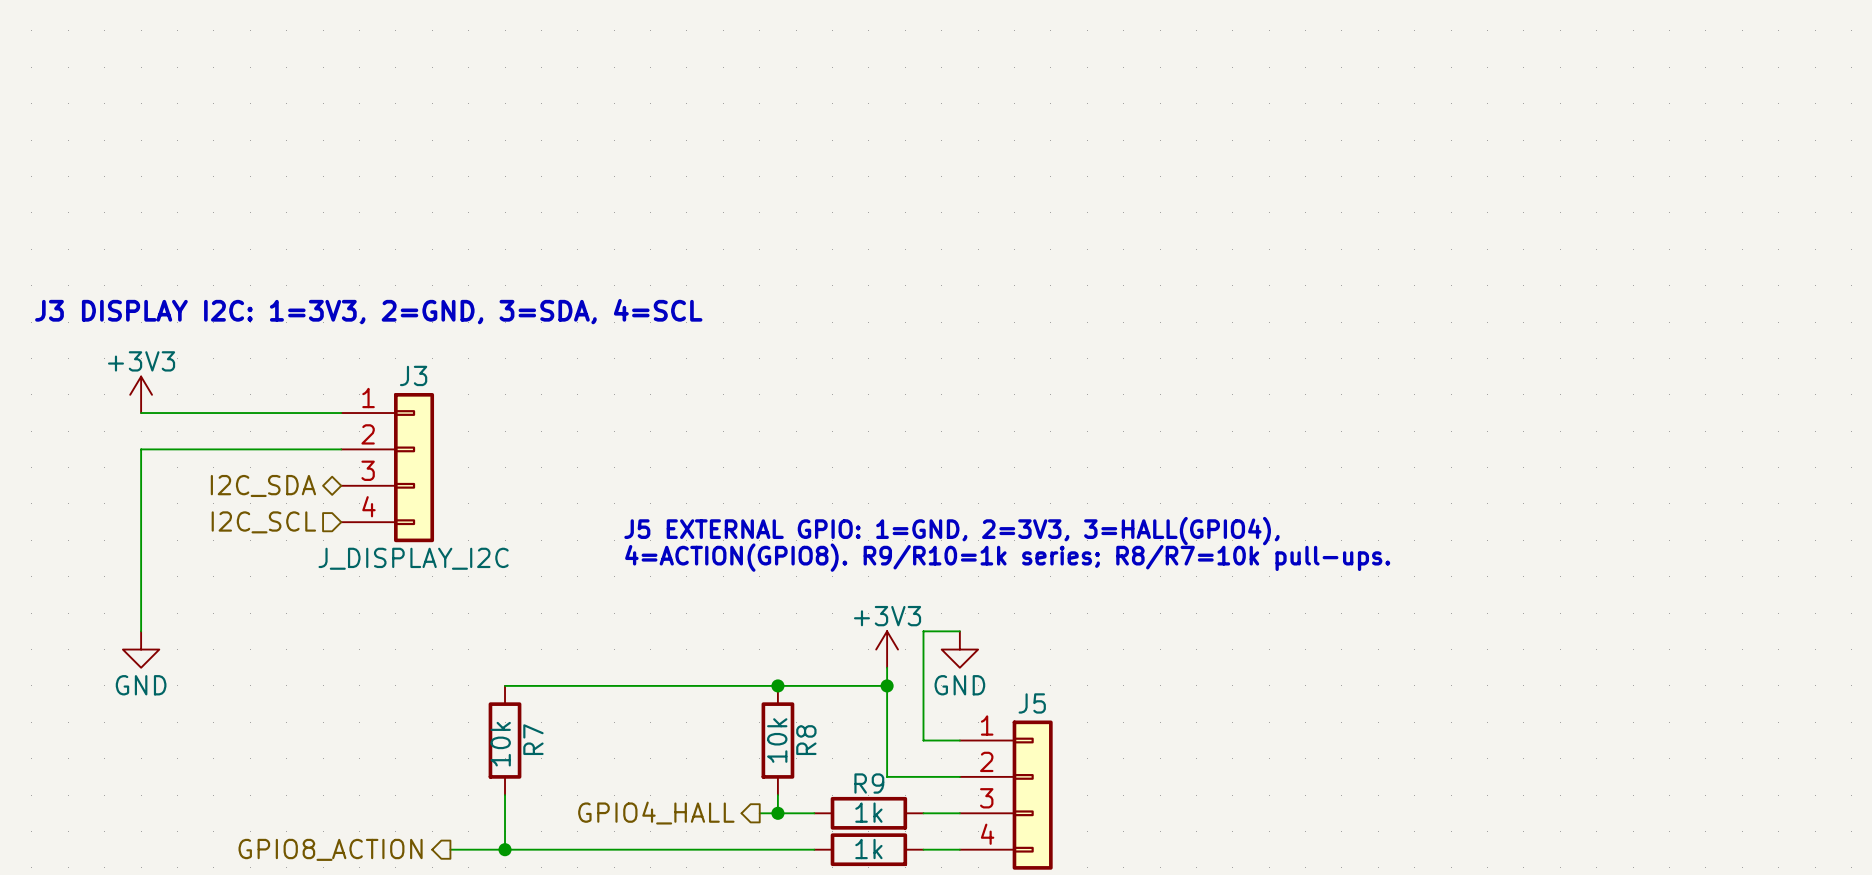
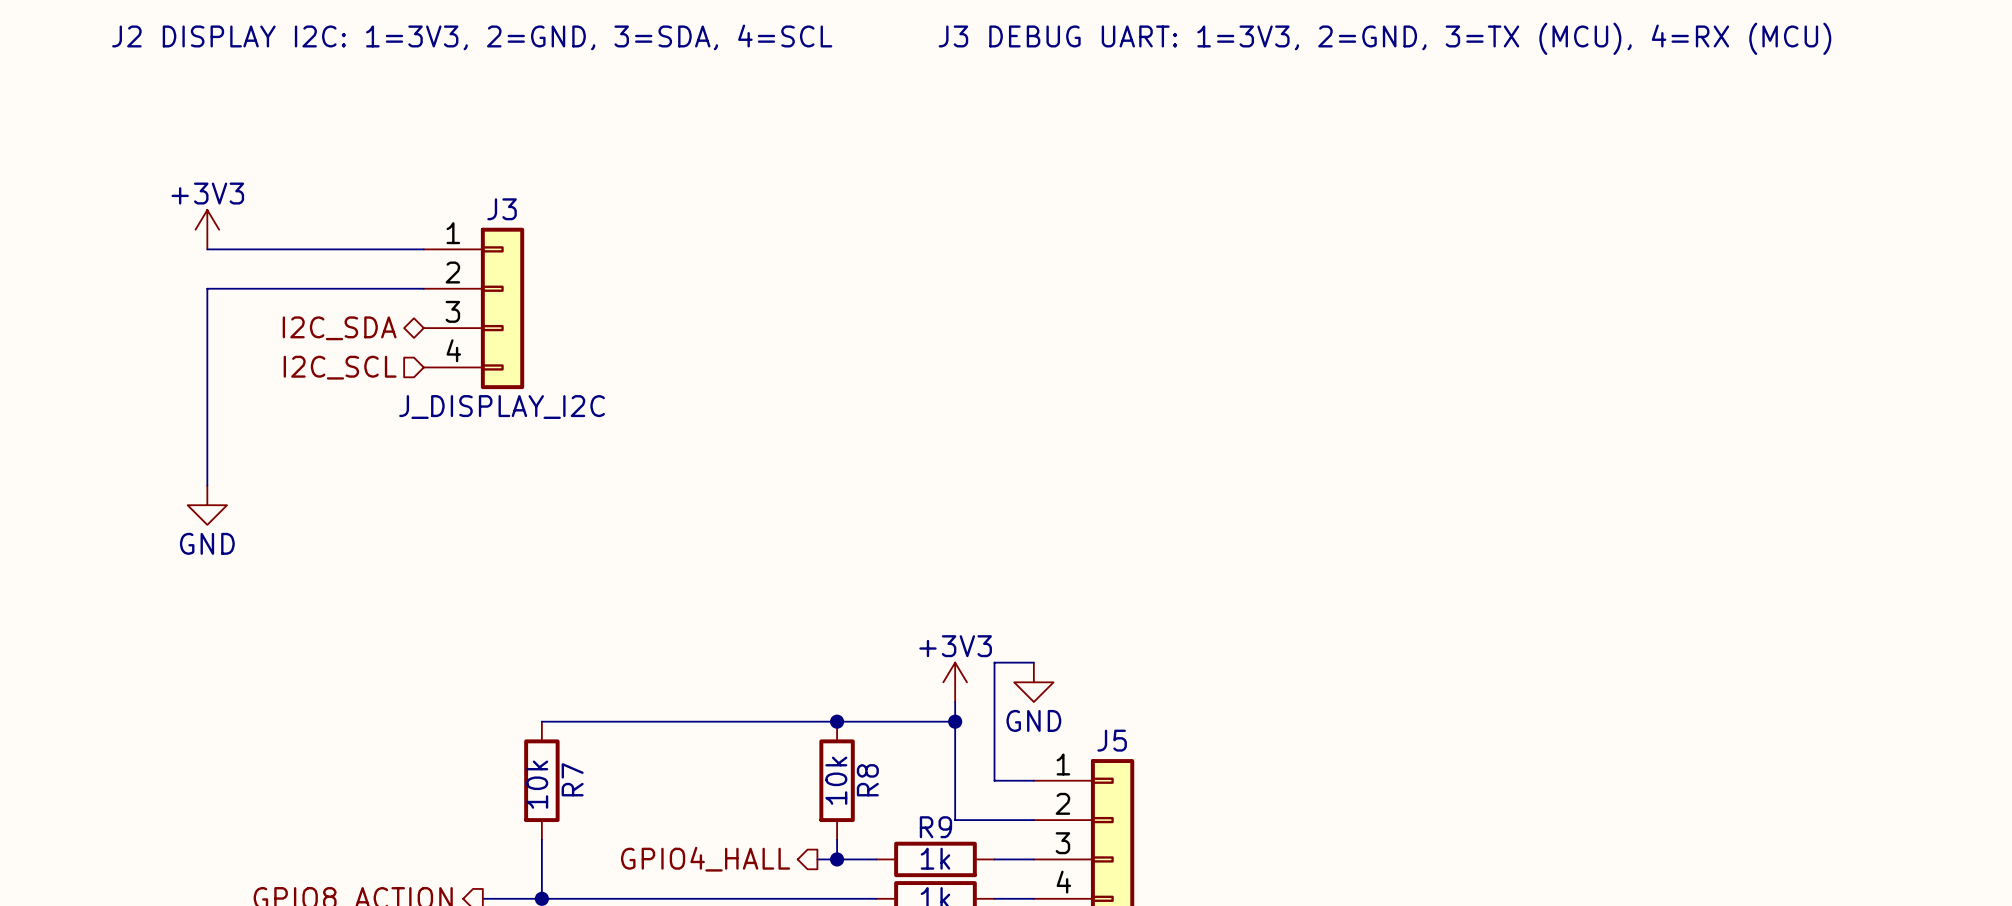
text: none -> J2 DISPLAY I2C: 1=3V3, 2=GND, 3=SDA, 4=SCL (472, 37)
text: none -> J3 DEBUG UART: 1=3V3, 2=GND, 3=TX (MCU), 4=RX (MCU) (1384, 38)
text: J3 DISPLAY I2C: 1=3V3, 2=GND, 3=SDA, 4=SCL (368, 311) -> none
power symbol position: +3V3 (141, 394) -> +3V3 (207, 229)
wire: (141, 413) (341, 413) -> (207, 249) (423, 249)
wire: (341, 449) (141, 449) (141, 631) -> (423, 288) (207, 288) (207, 485)
J3 position: (387, 467) -> (473, 308)
hierarchical label position: I2C_SDA (263, 485) -> I2C_SDA (339, 328)
hierarchical label position: I2C_SCL (263, 522) -> I2C_SCL (340, 367)
text: J5 EXTERNAL GPIO: 1=GND, 2=3V3, 3=HALL(GPIO4), (951, 531) -> none
text: 4=ACTION(GPIO8). R9/R10=1k series; R8/R7=10k pull-ups. (1007, 557) -> none
power symbol position: GND (141, 649) -> GND (207, 505)

